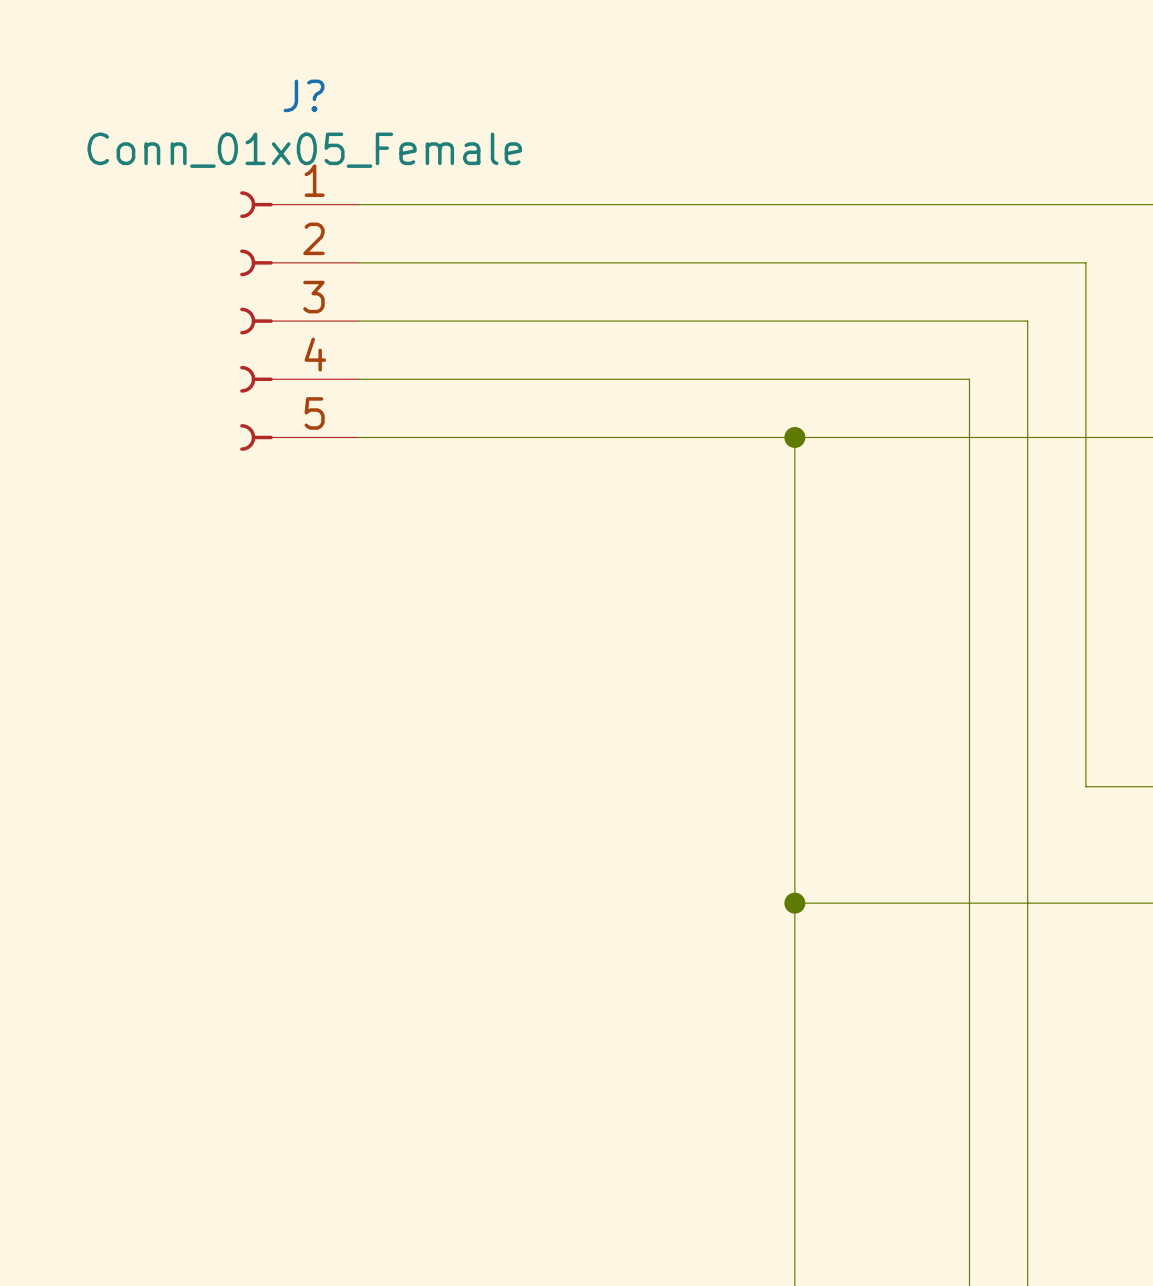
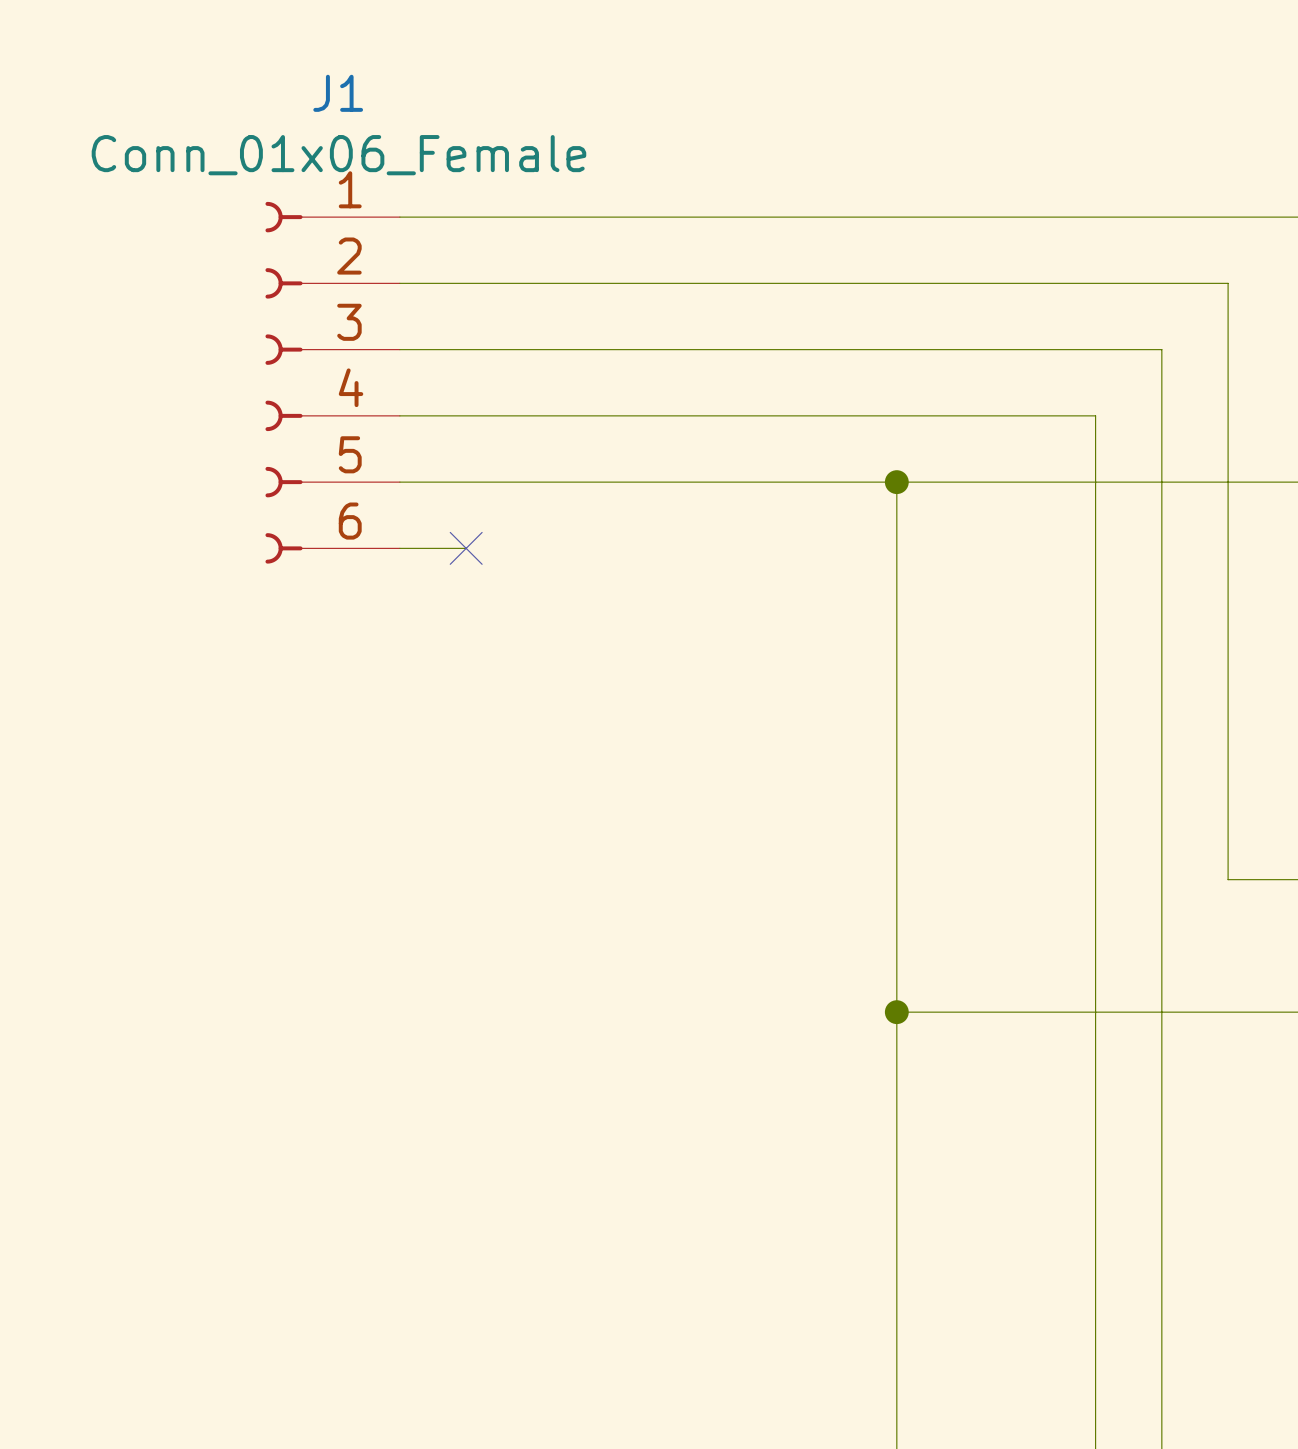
J?: Conn_01x05_Female (299, 321) -> none
J1: none -> Conn_01x06_Female (332, 382)
wire: none -> (399, 548) (466, 548)
no-connect mark: none -> (466, 548)

